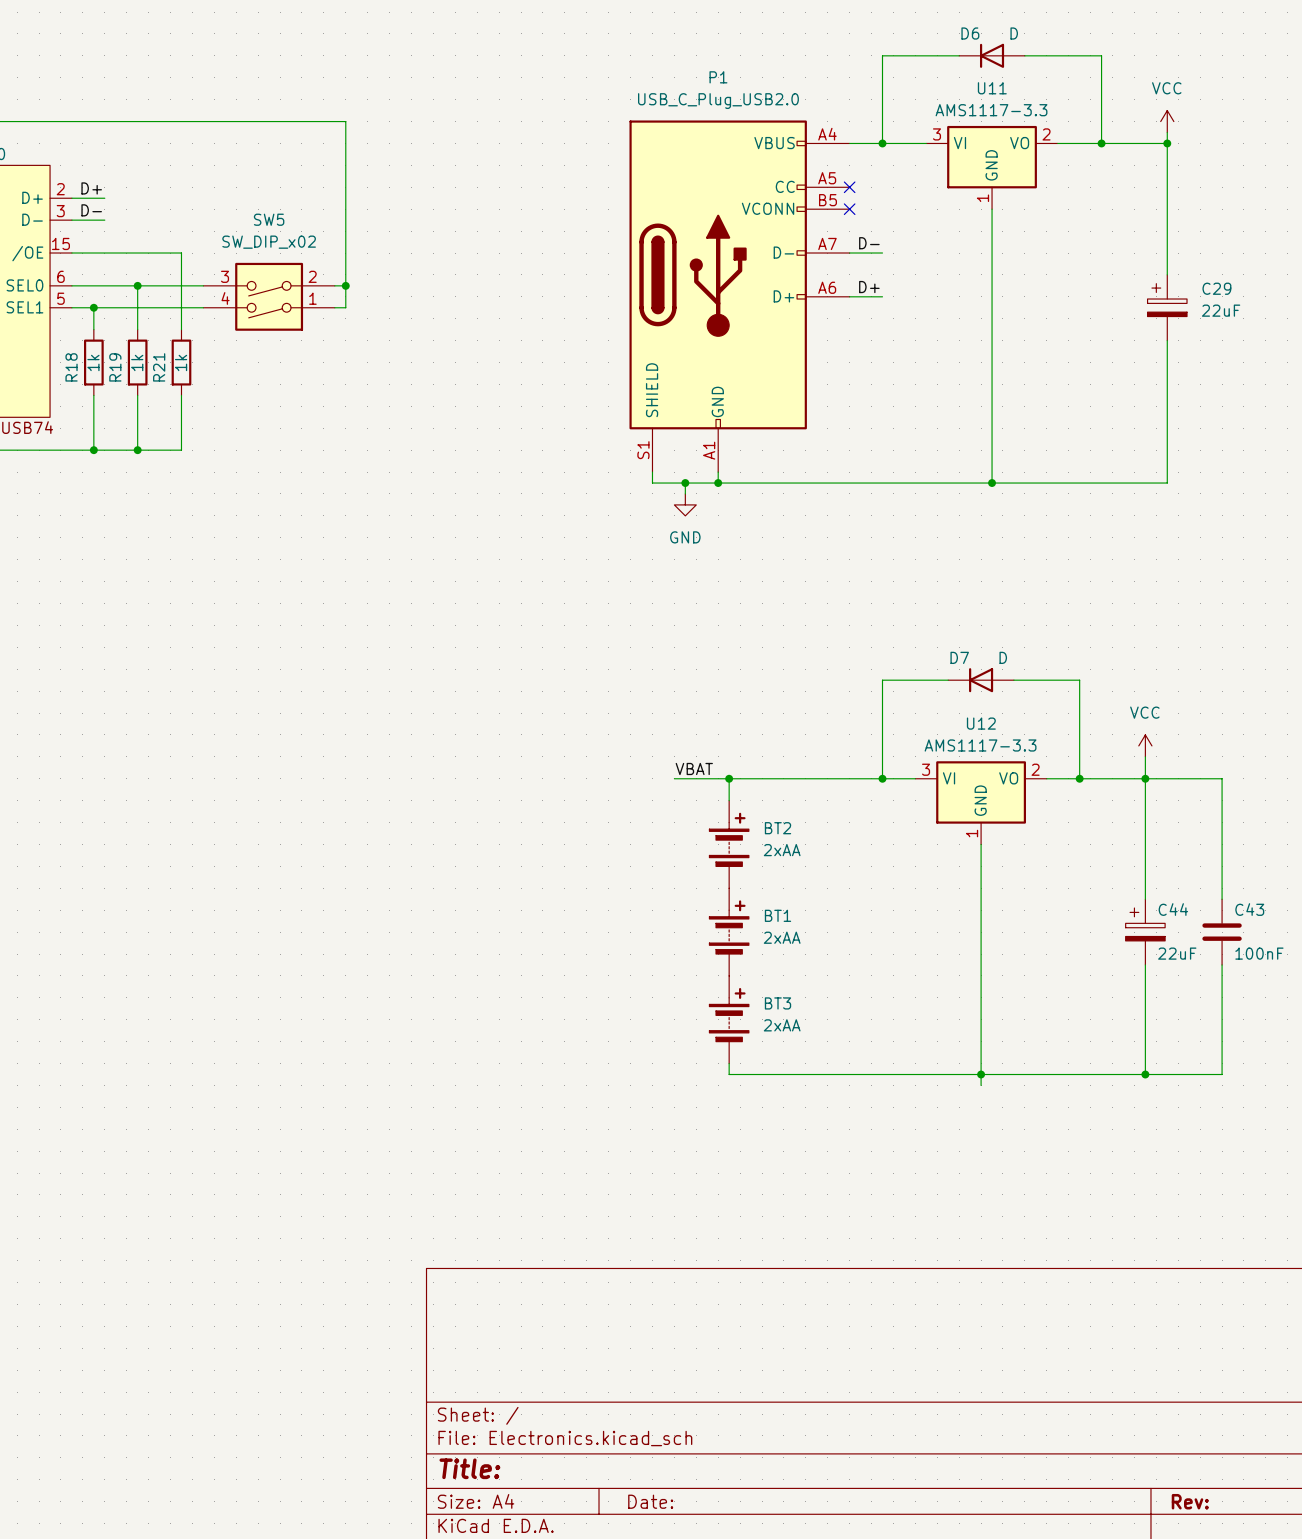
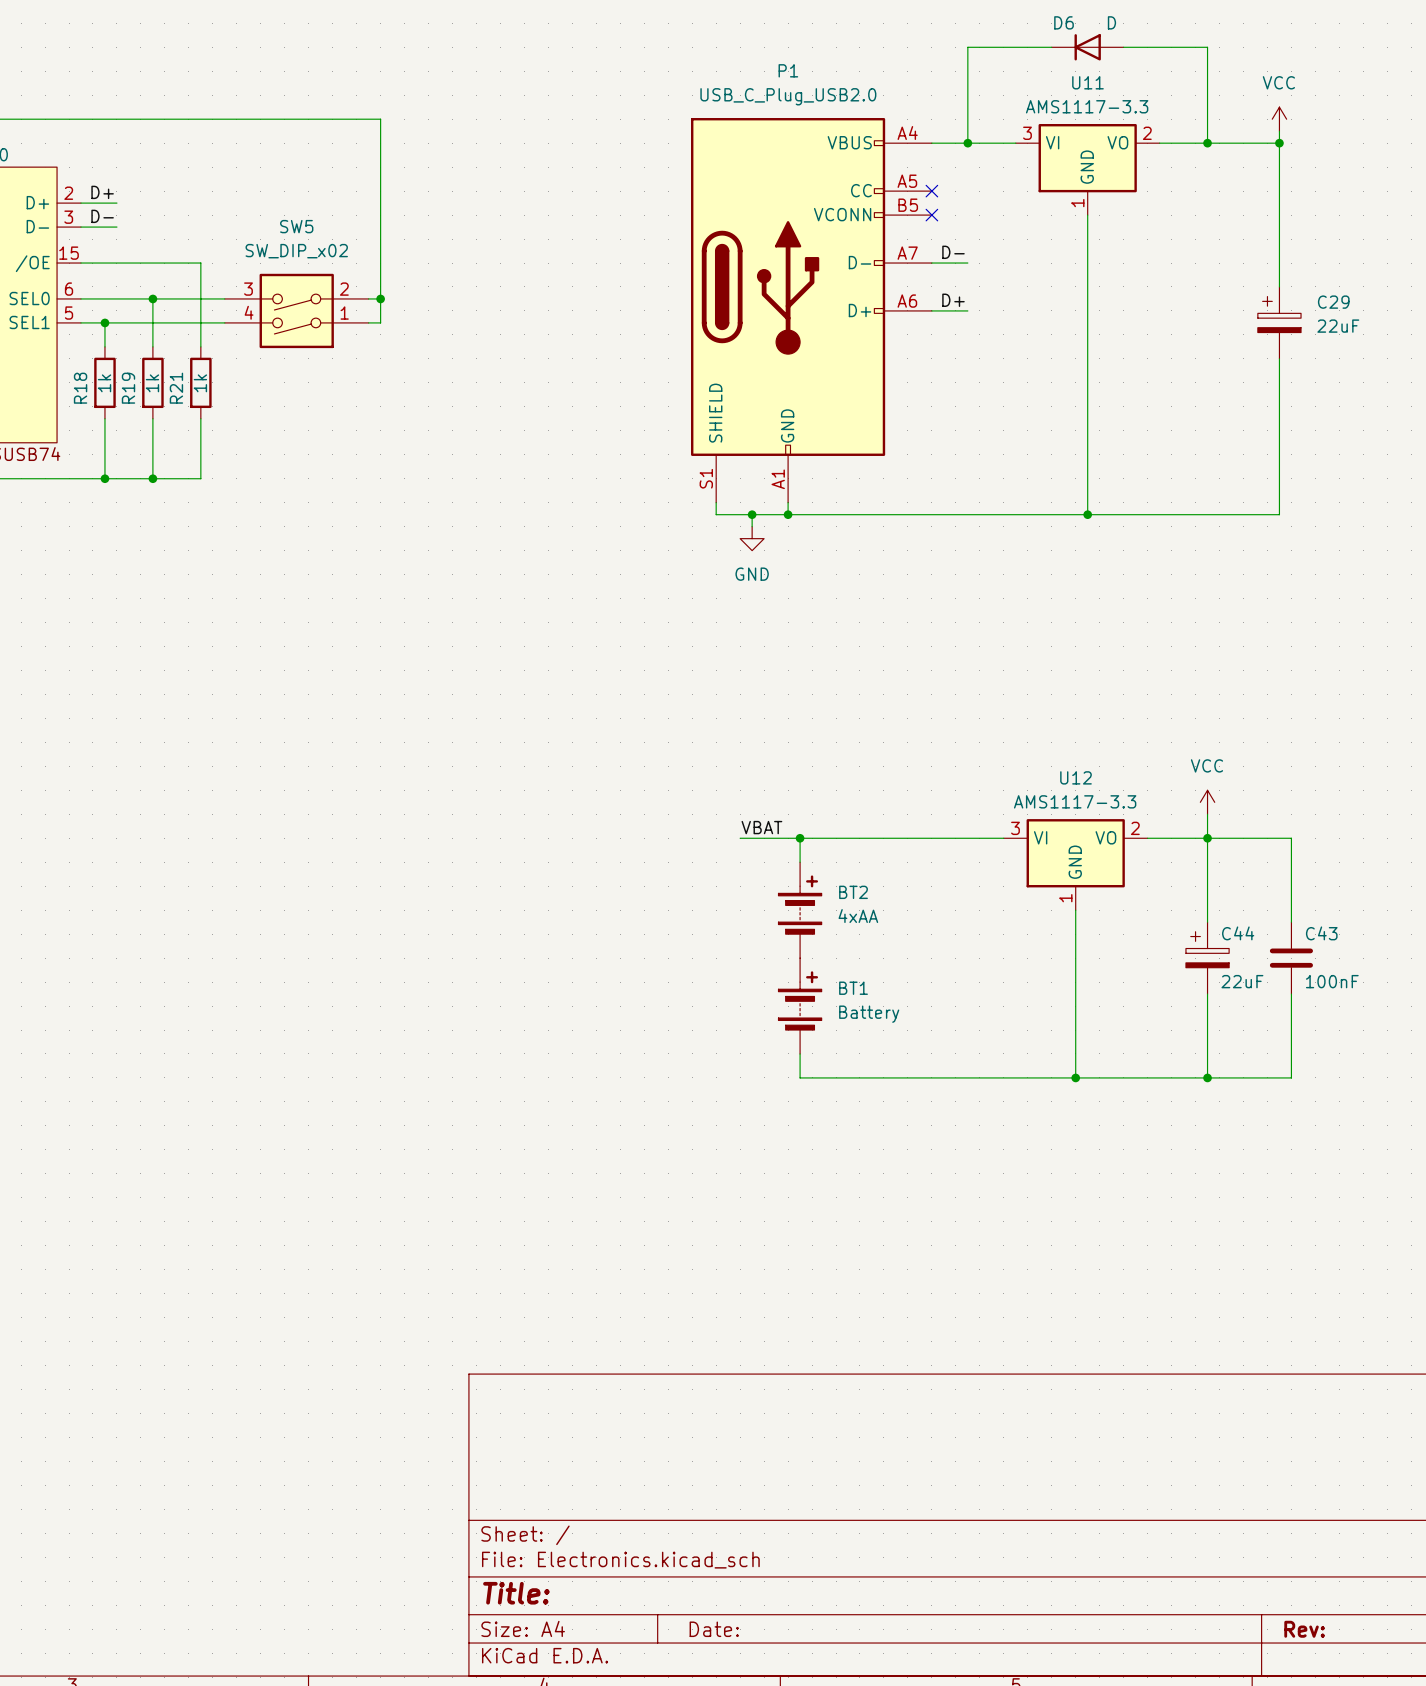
wire: (948, 680) (882, 680) (882, 778) -> none
D7: D (981, 680) -> none
wire: (1013, 680) (1079, 680) (1079, 778) -> none
power symbol position: VCC (1145, 745) -> VCC (1207, 802)
wire: none -> (1207, 814) (1207, 922)
wire: (1145, 756) (1145, 899) -> none
junction: (882, 778) -> none
junction: (1079, 778) -> none
junction: none -> (1207, 838)
junction: (1145, 778) -> none
wire: (1178, 778) (1222, 778) (1222, 899) -> (1291, 838) (1291, 922)
BT2 value: 2xAA (782, 850) -> 4xAA (858, 916)
wire: none -> (1207, 994) (1207, 1077)
wire: none -> (1291, 994) (1291, 1077) (800, 1077) (800, 1053)
C44 position: (1145, 932) -> (1207, 958)
C43 position: (1222, 932) -> (1291, 958)
BT1 value: 2xAA (782, 937) -> Battery (869, 1014)
wire: (1145, 964) (1145, 1074) -> none
wire: (1222, 964) (1222, 1074) (729, 1074) (729, 1063) -> none
wire: (981, 997) (981, 1085) -> none
junction: none -> (1075, 1077)
junction: none -> (1207, 1077)
BT3: 2xAA (729, 1019) -> none
junction: (981, 1074) -> none
junction: (1145, 1074) -> none

